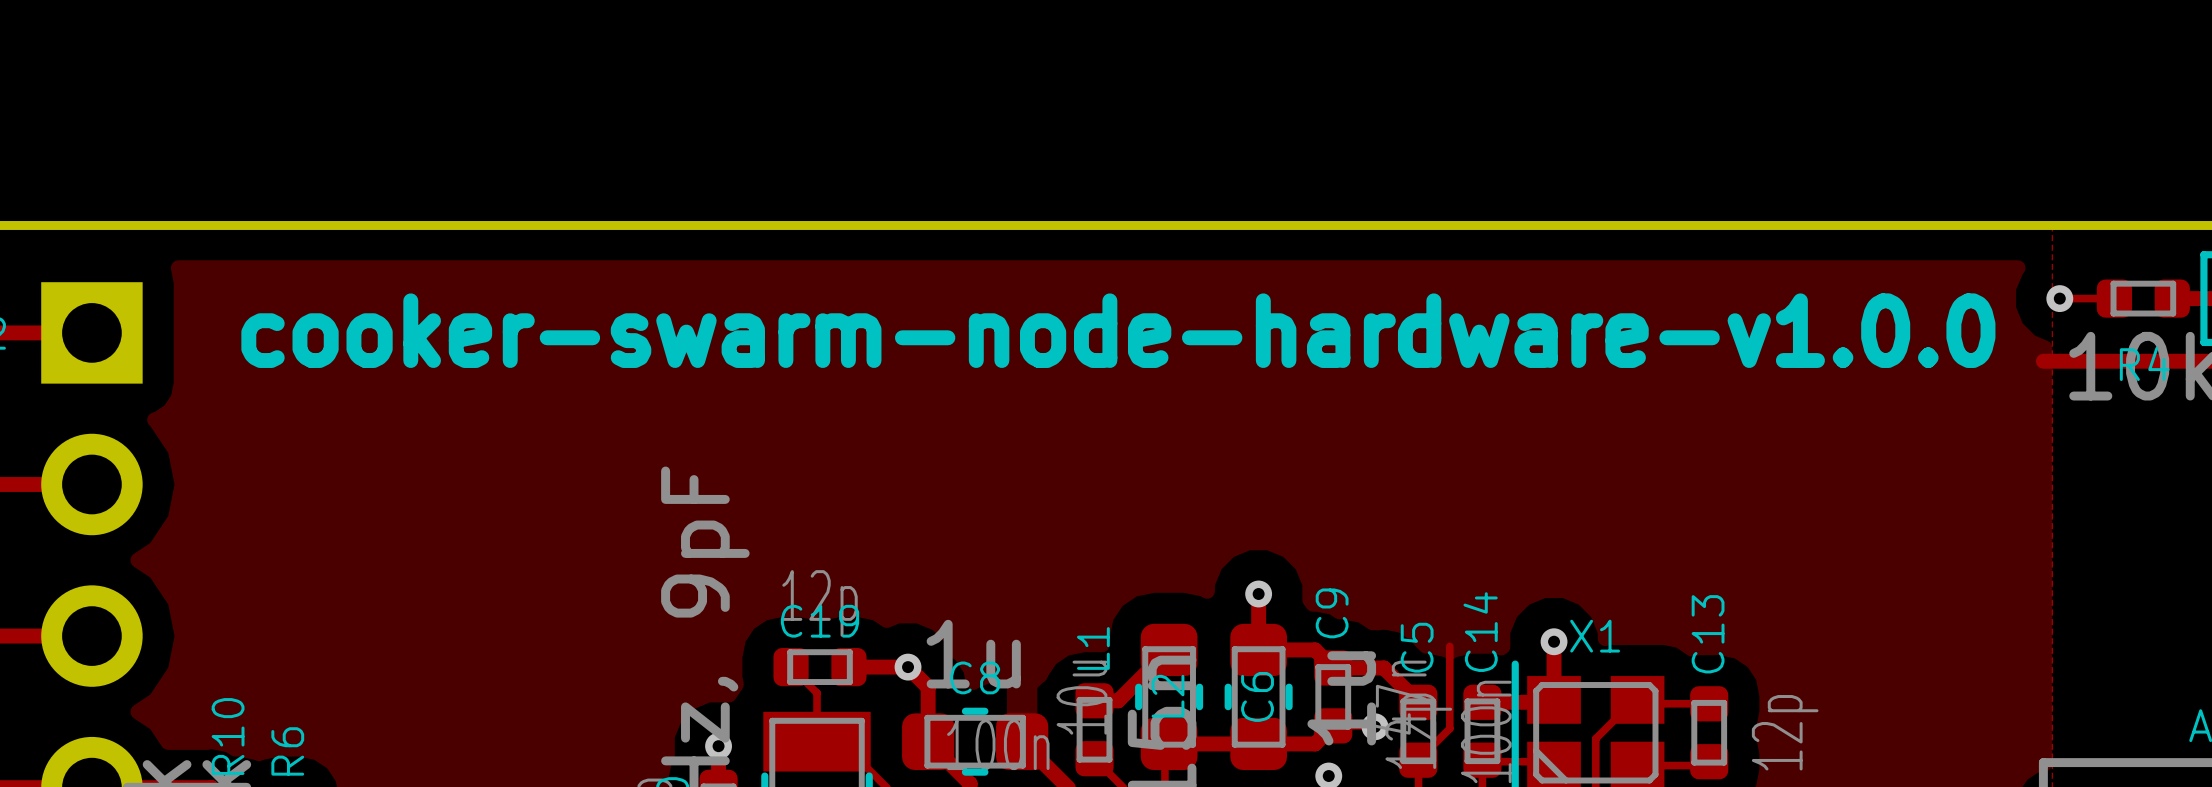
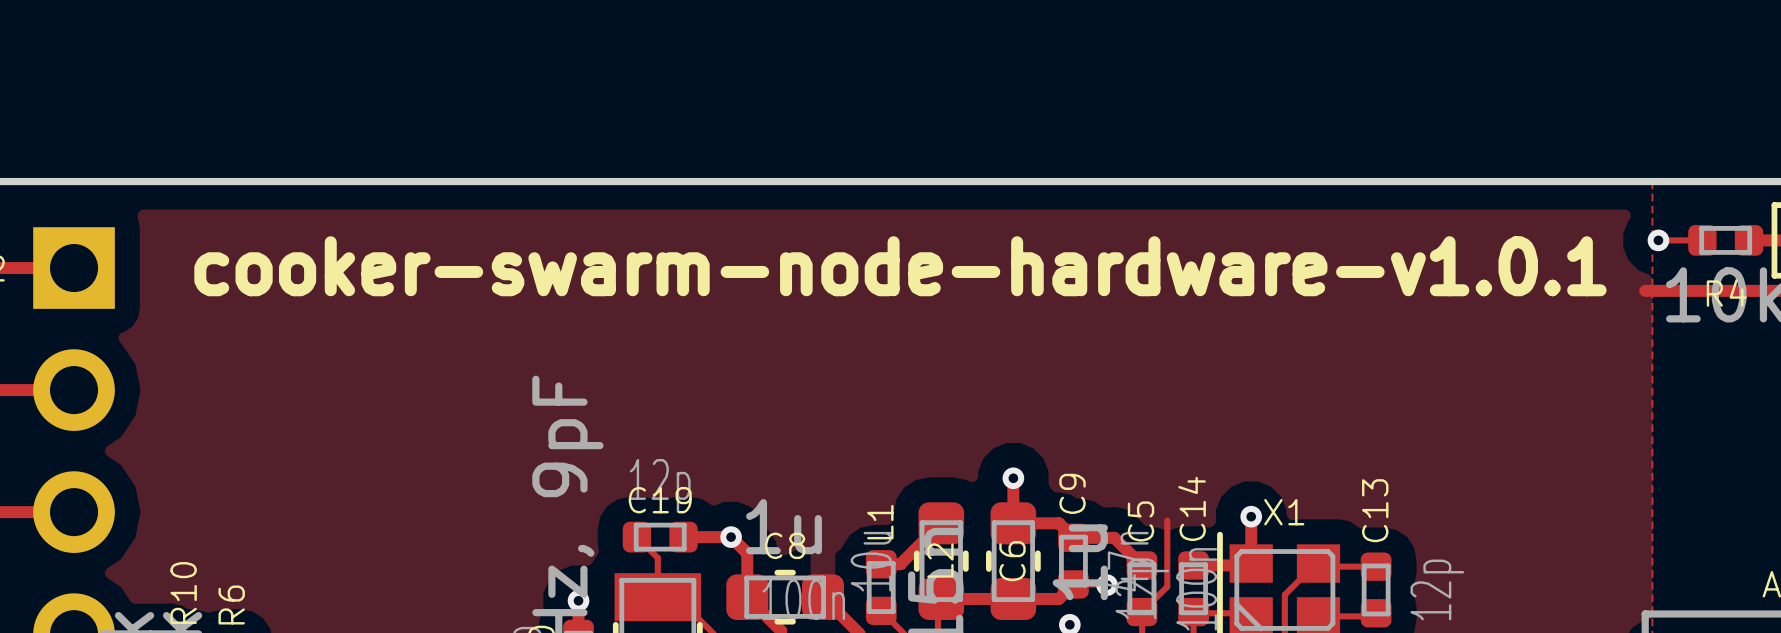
text: cooker-swarm-node-hardware-v1.0.0 (1118, 330) -> cooker-swarm-node-hardware-v1.0.1 (900, 266)

